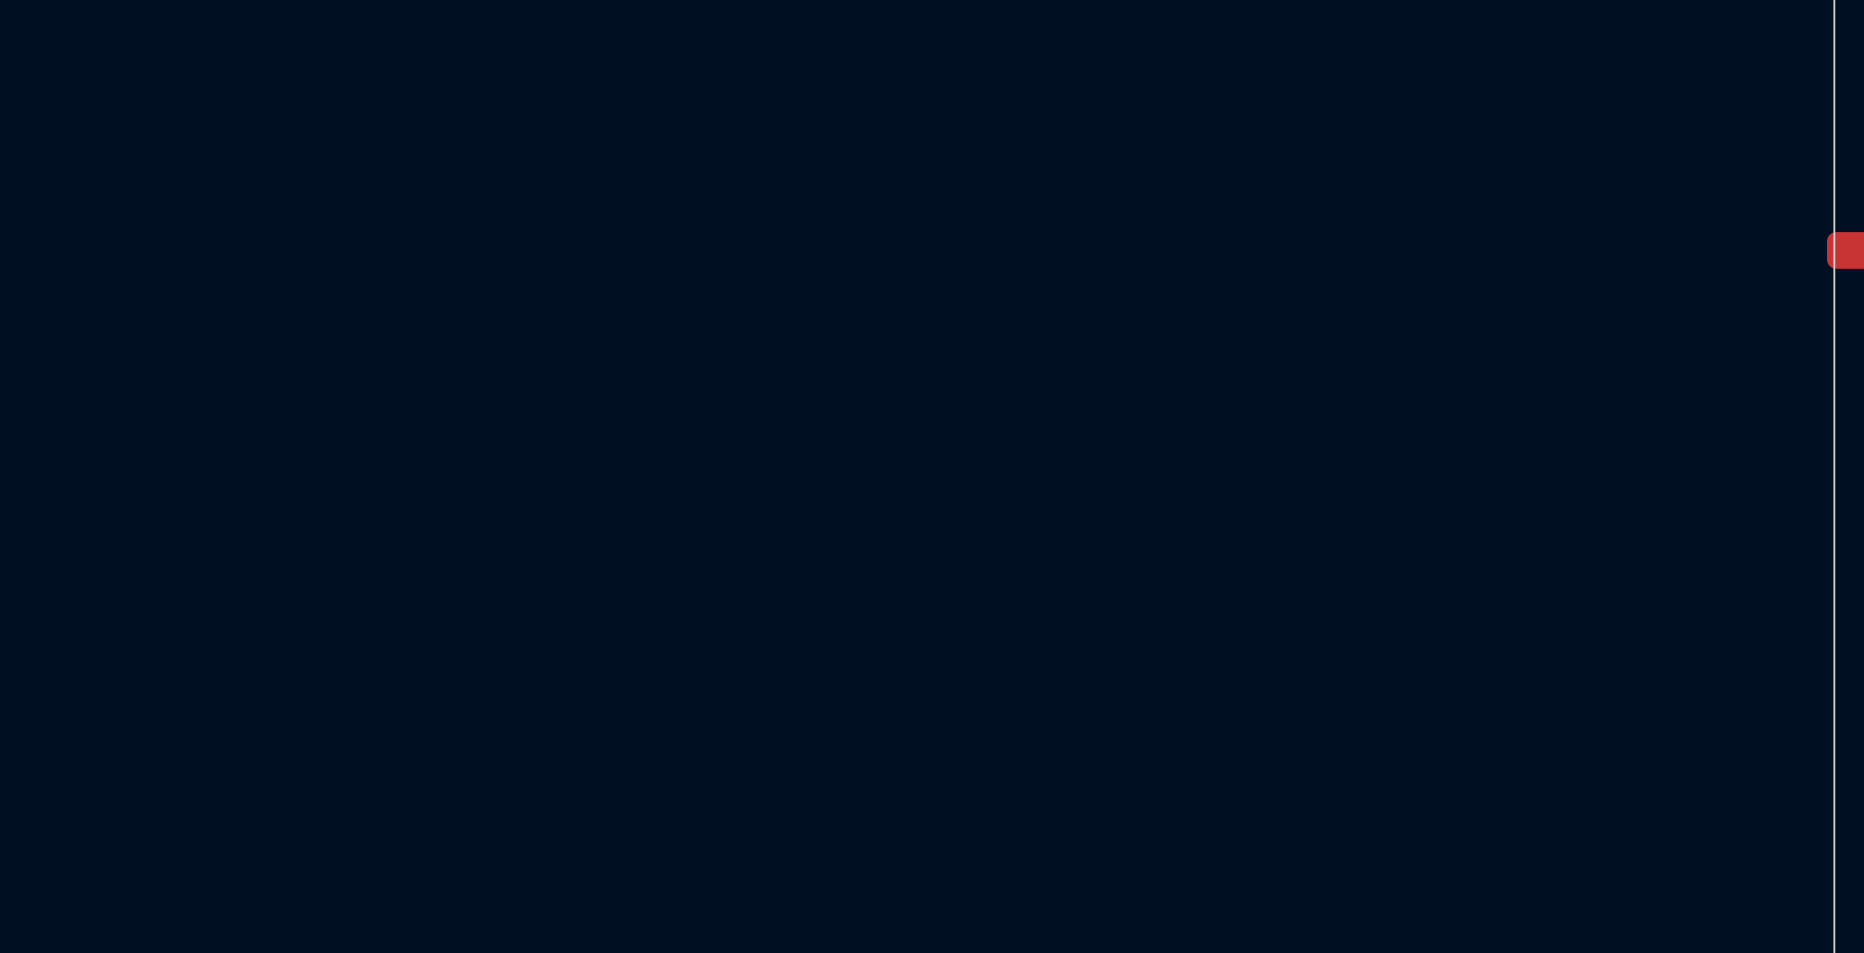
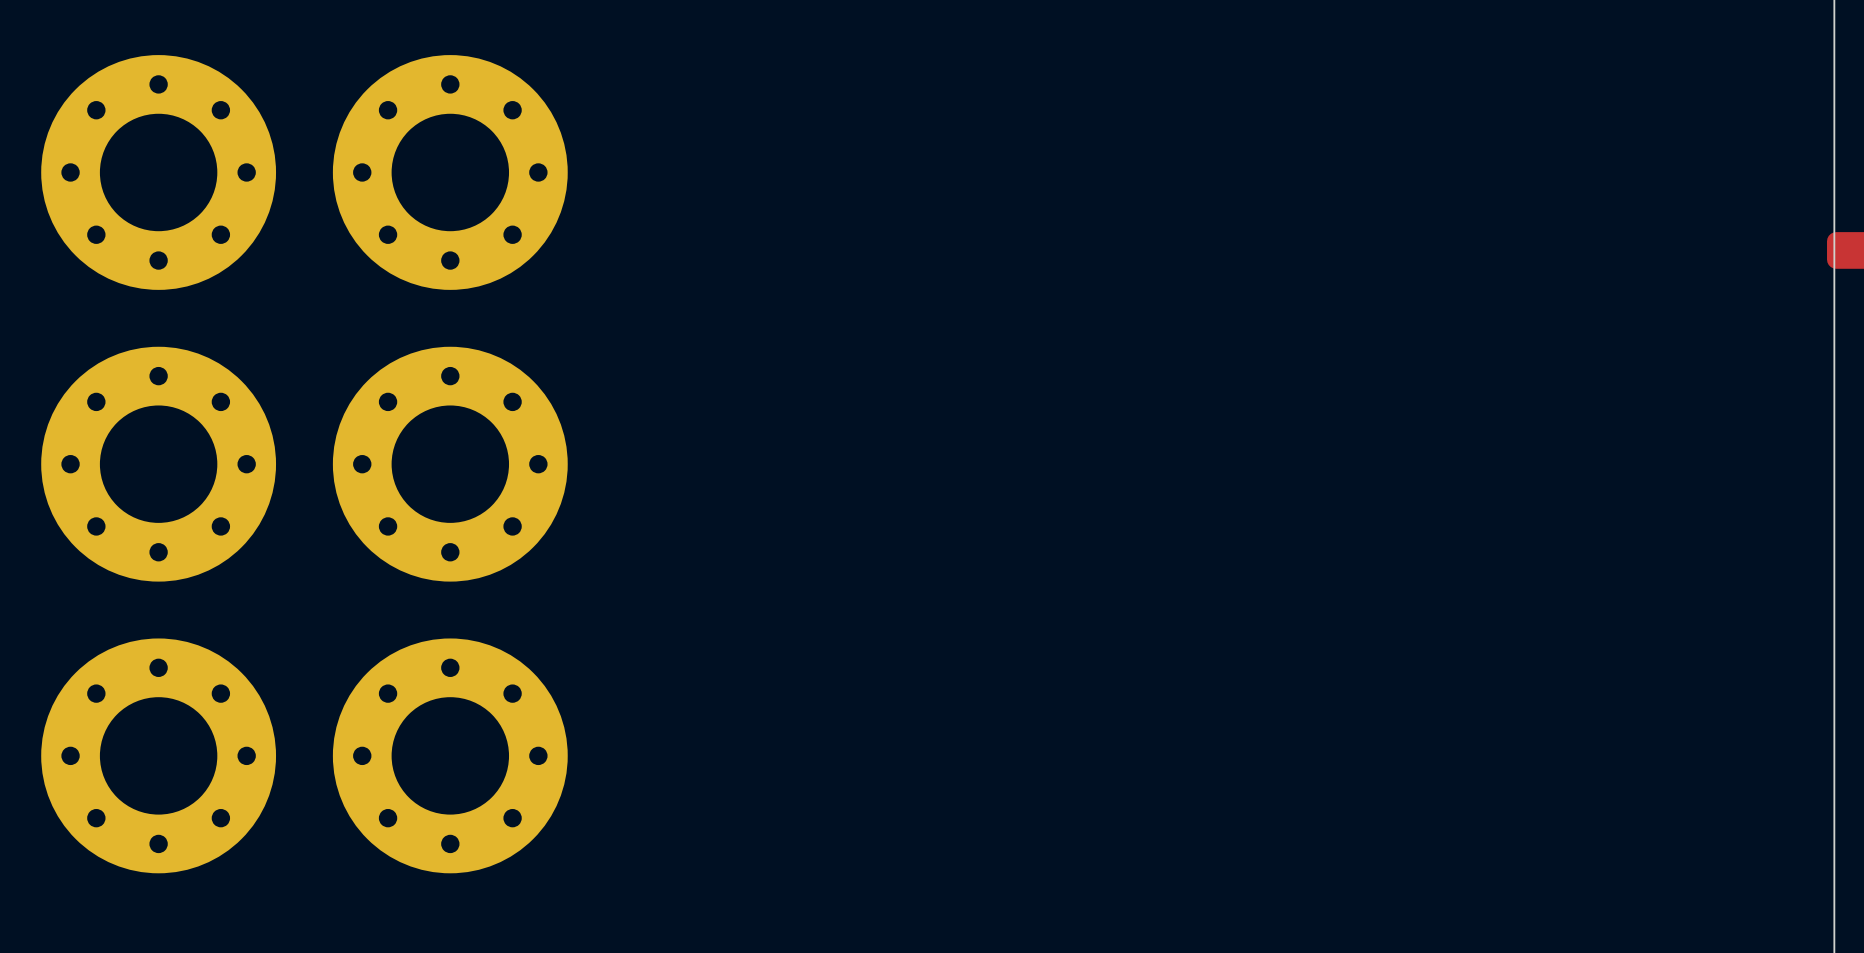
part: none -> (158, 172)
part: none -> (450, 172)
part: none -> (158, 464)
part: none -> (450, 464)
part: none -> (158, 755)
part: none -> (450, 755)

